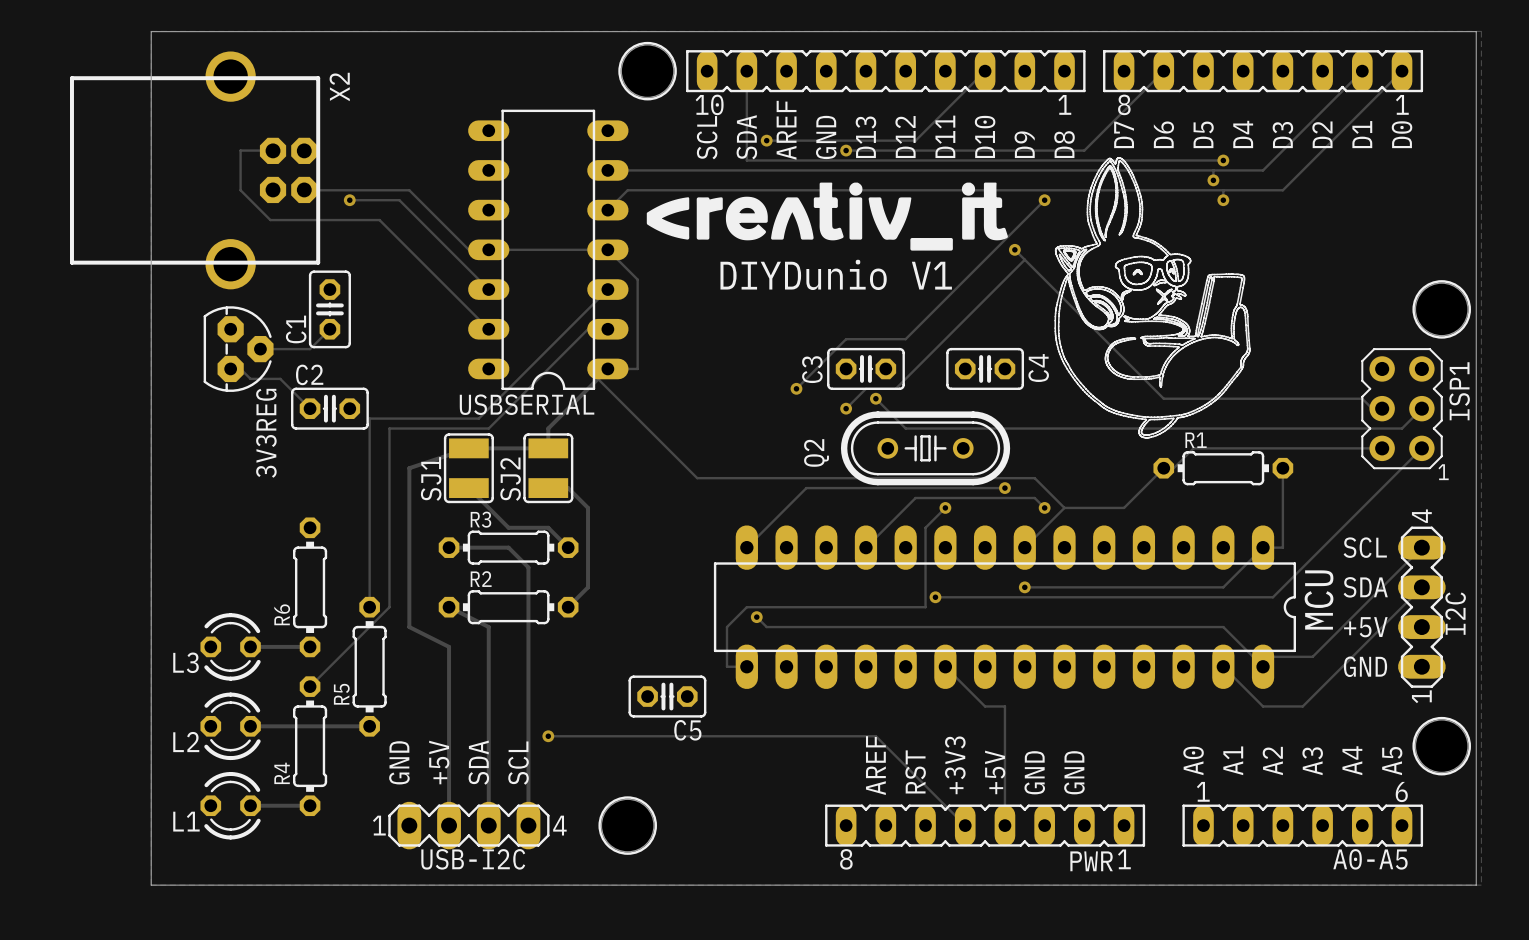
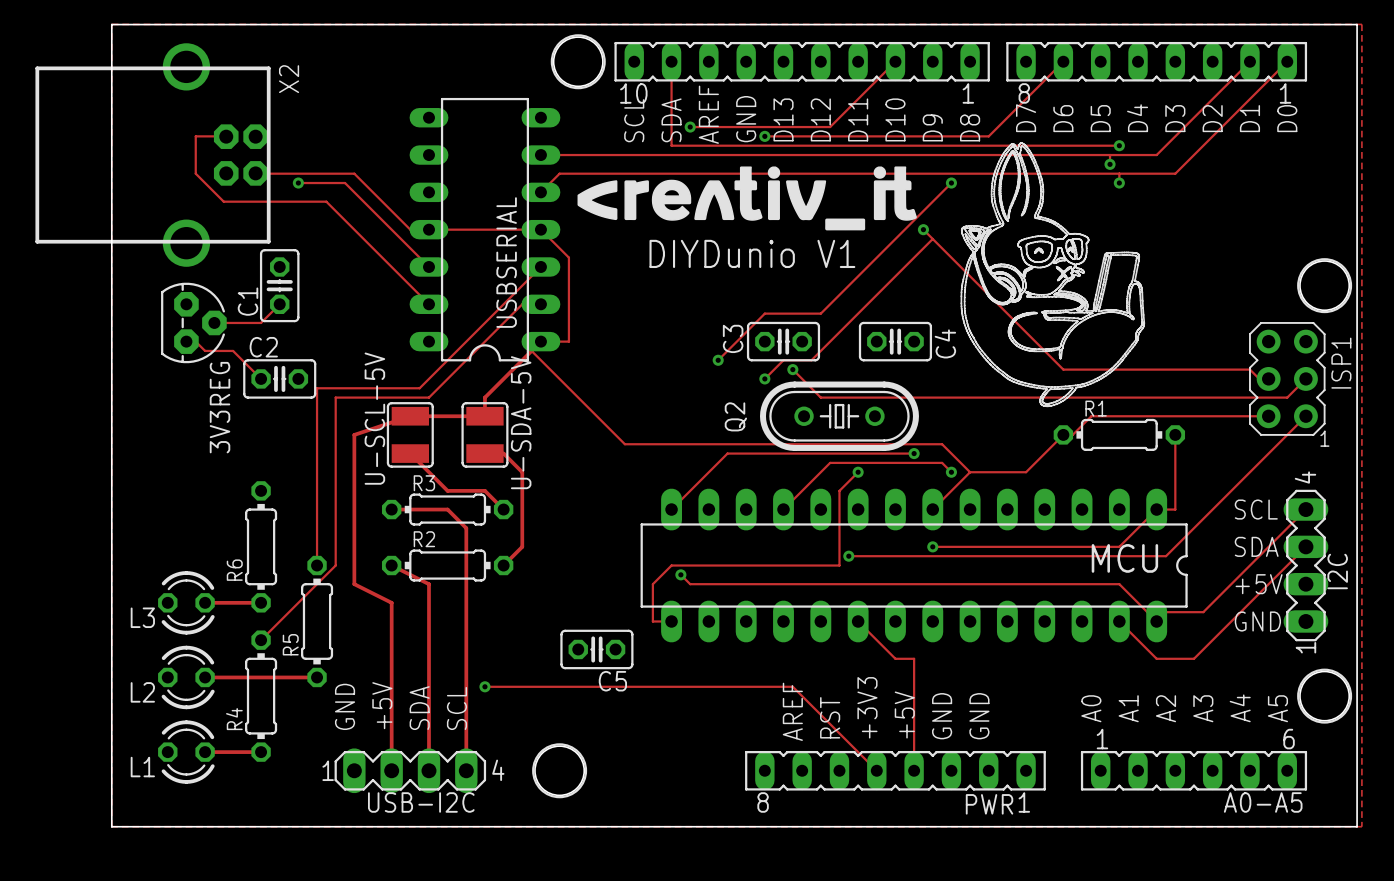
USBSERIAL name rotation: 0° (527, 404) -> 90° counterclockwise (506, 262)
SJ1 name: SJ1 (431, 478) -> U-SCL-5V (374, 418)
SJ2 name: SJ2 (510, 479) -> U-SDA-5V (521, 422)
MCU name rotation: 0° (1319, 599) -> 90° clockwise (1124, 558)
MCU name position: MCU (1319, 599) -> MCU (1124, 558)

